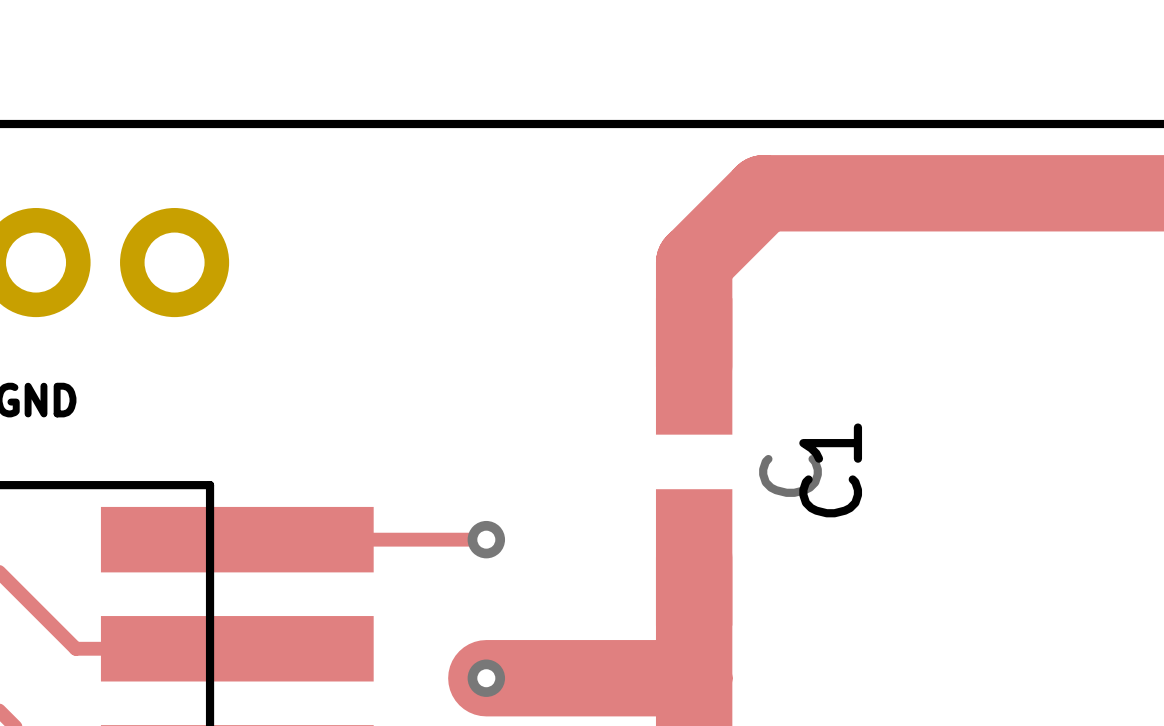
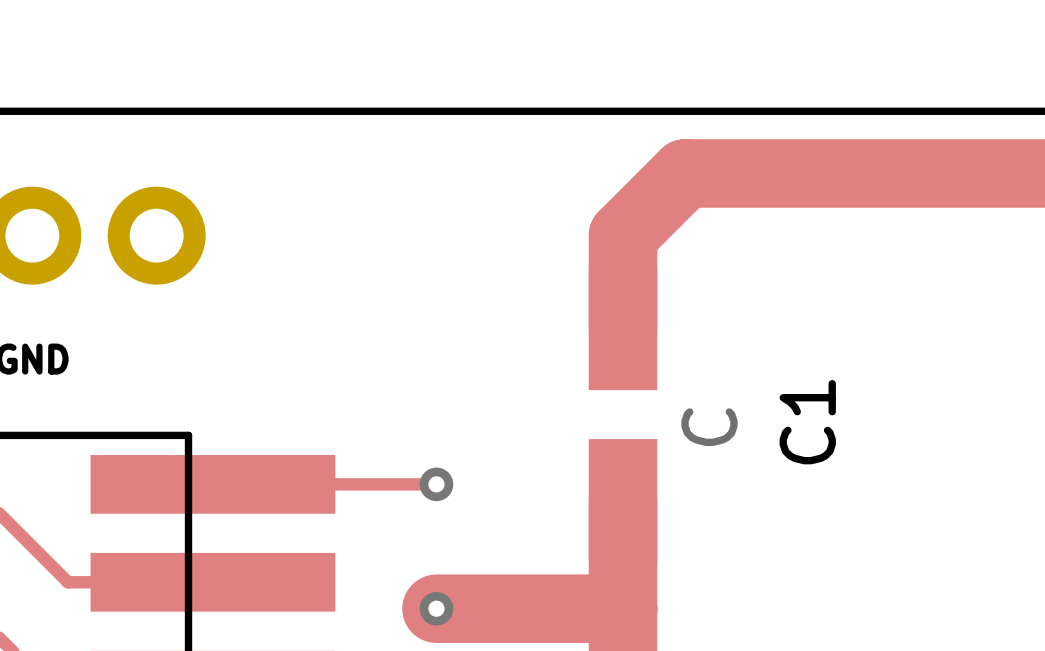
C1 name position: C1 (830, 470) -> C1 (807, 422)

